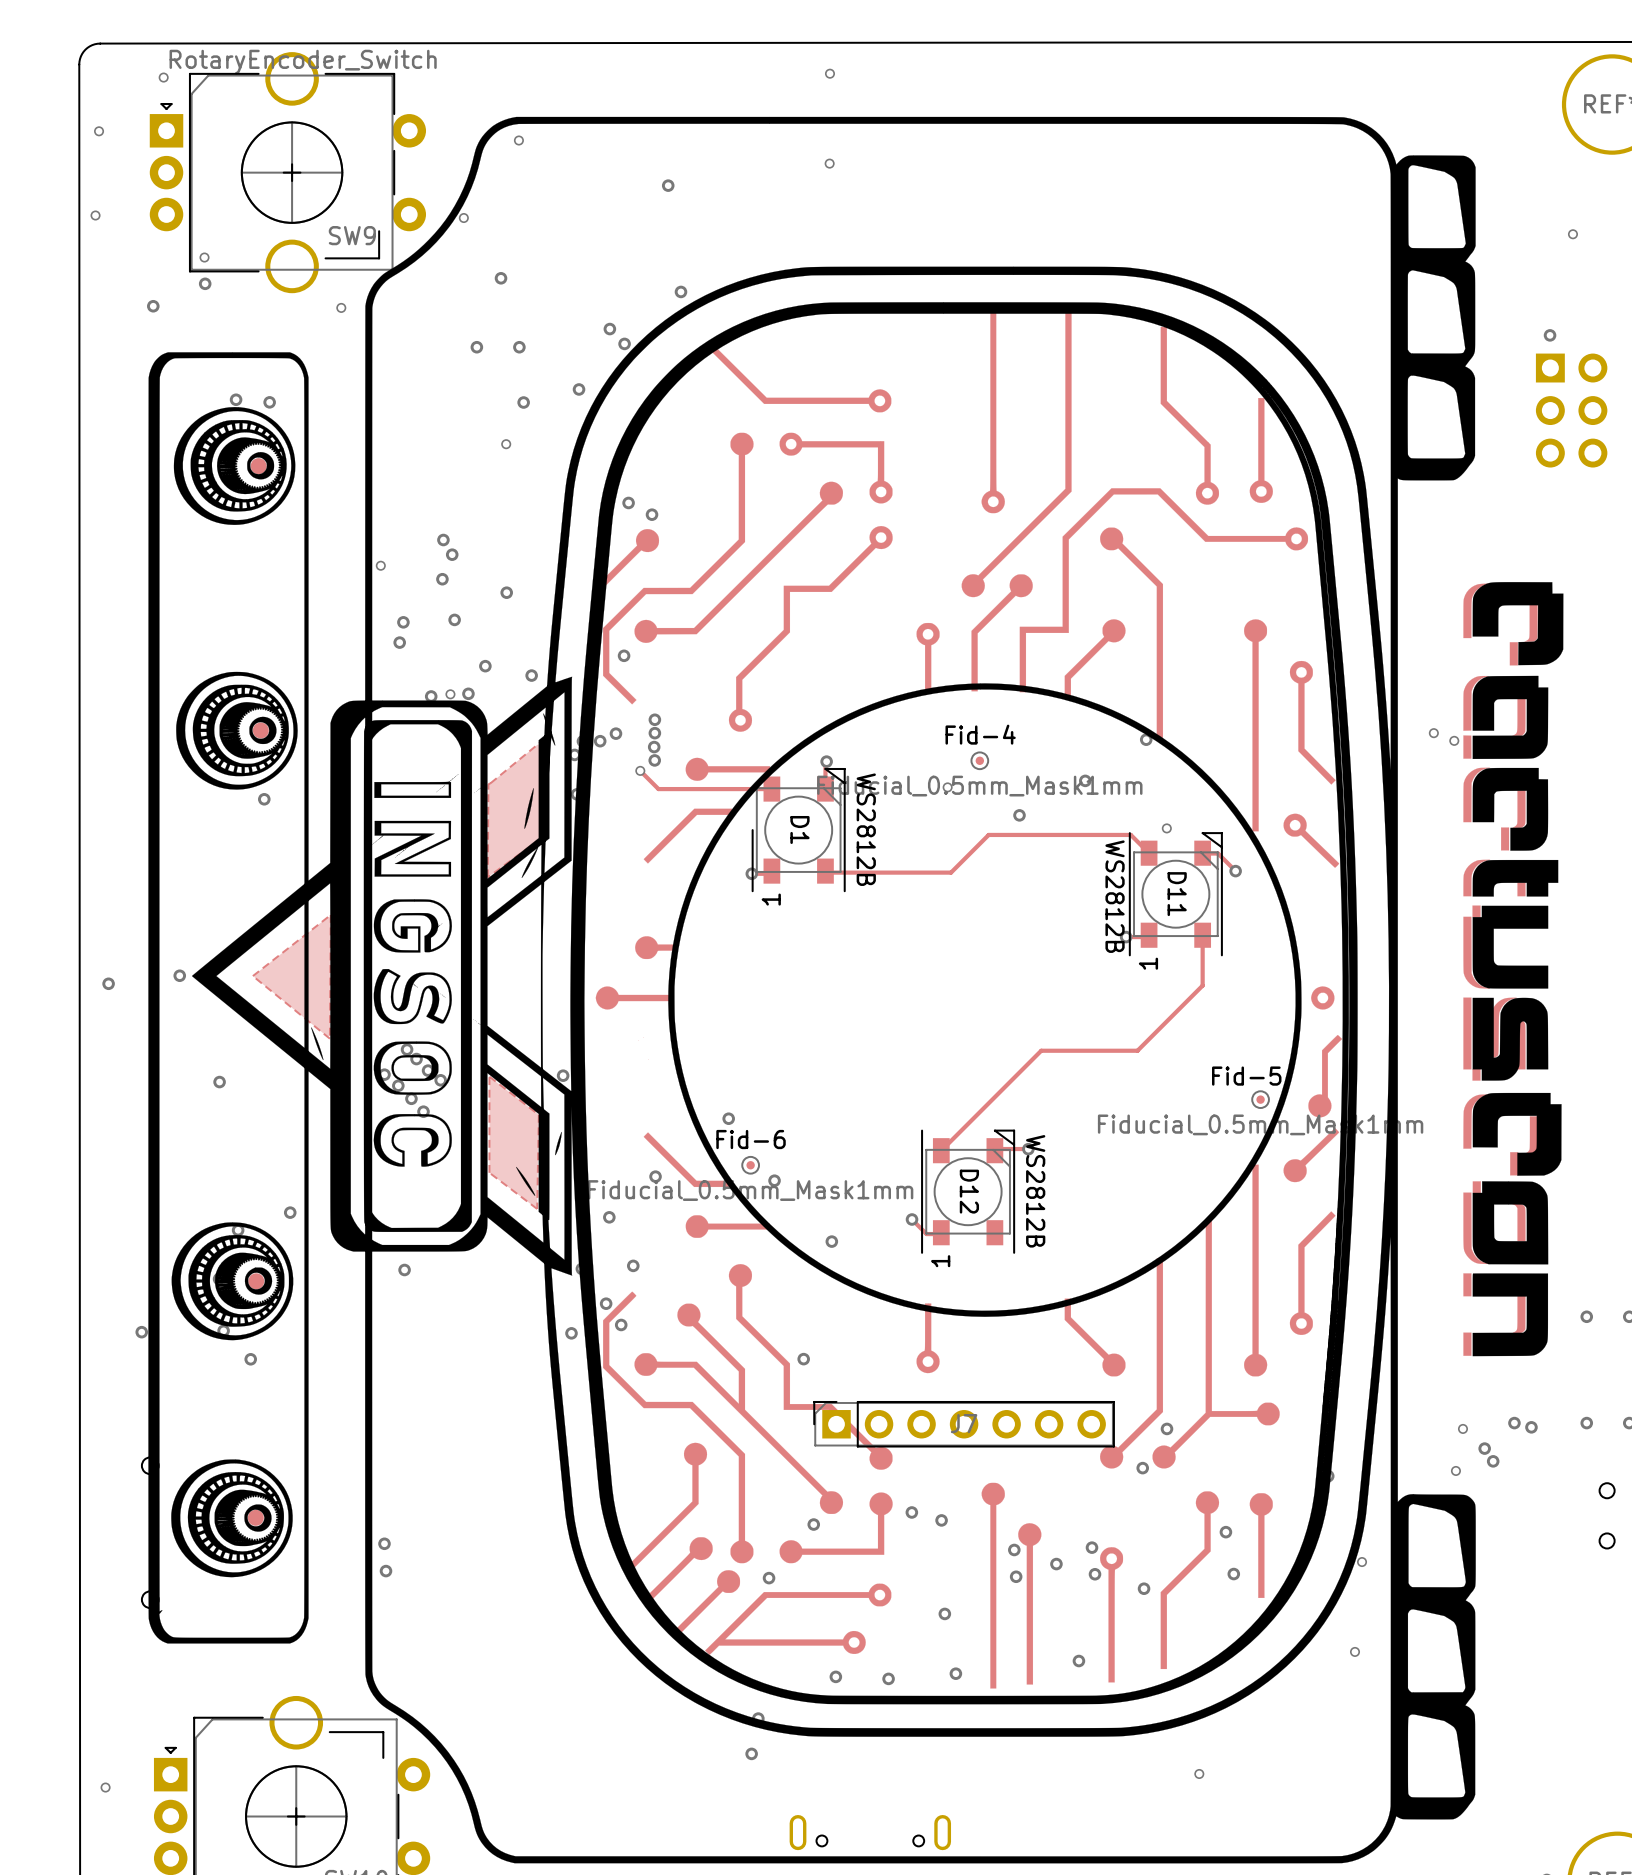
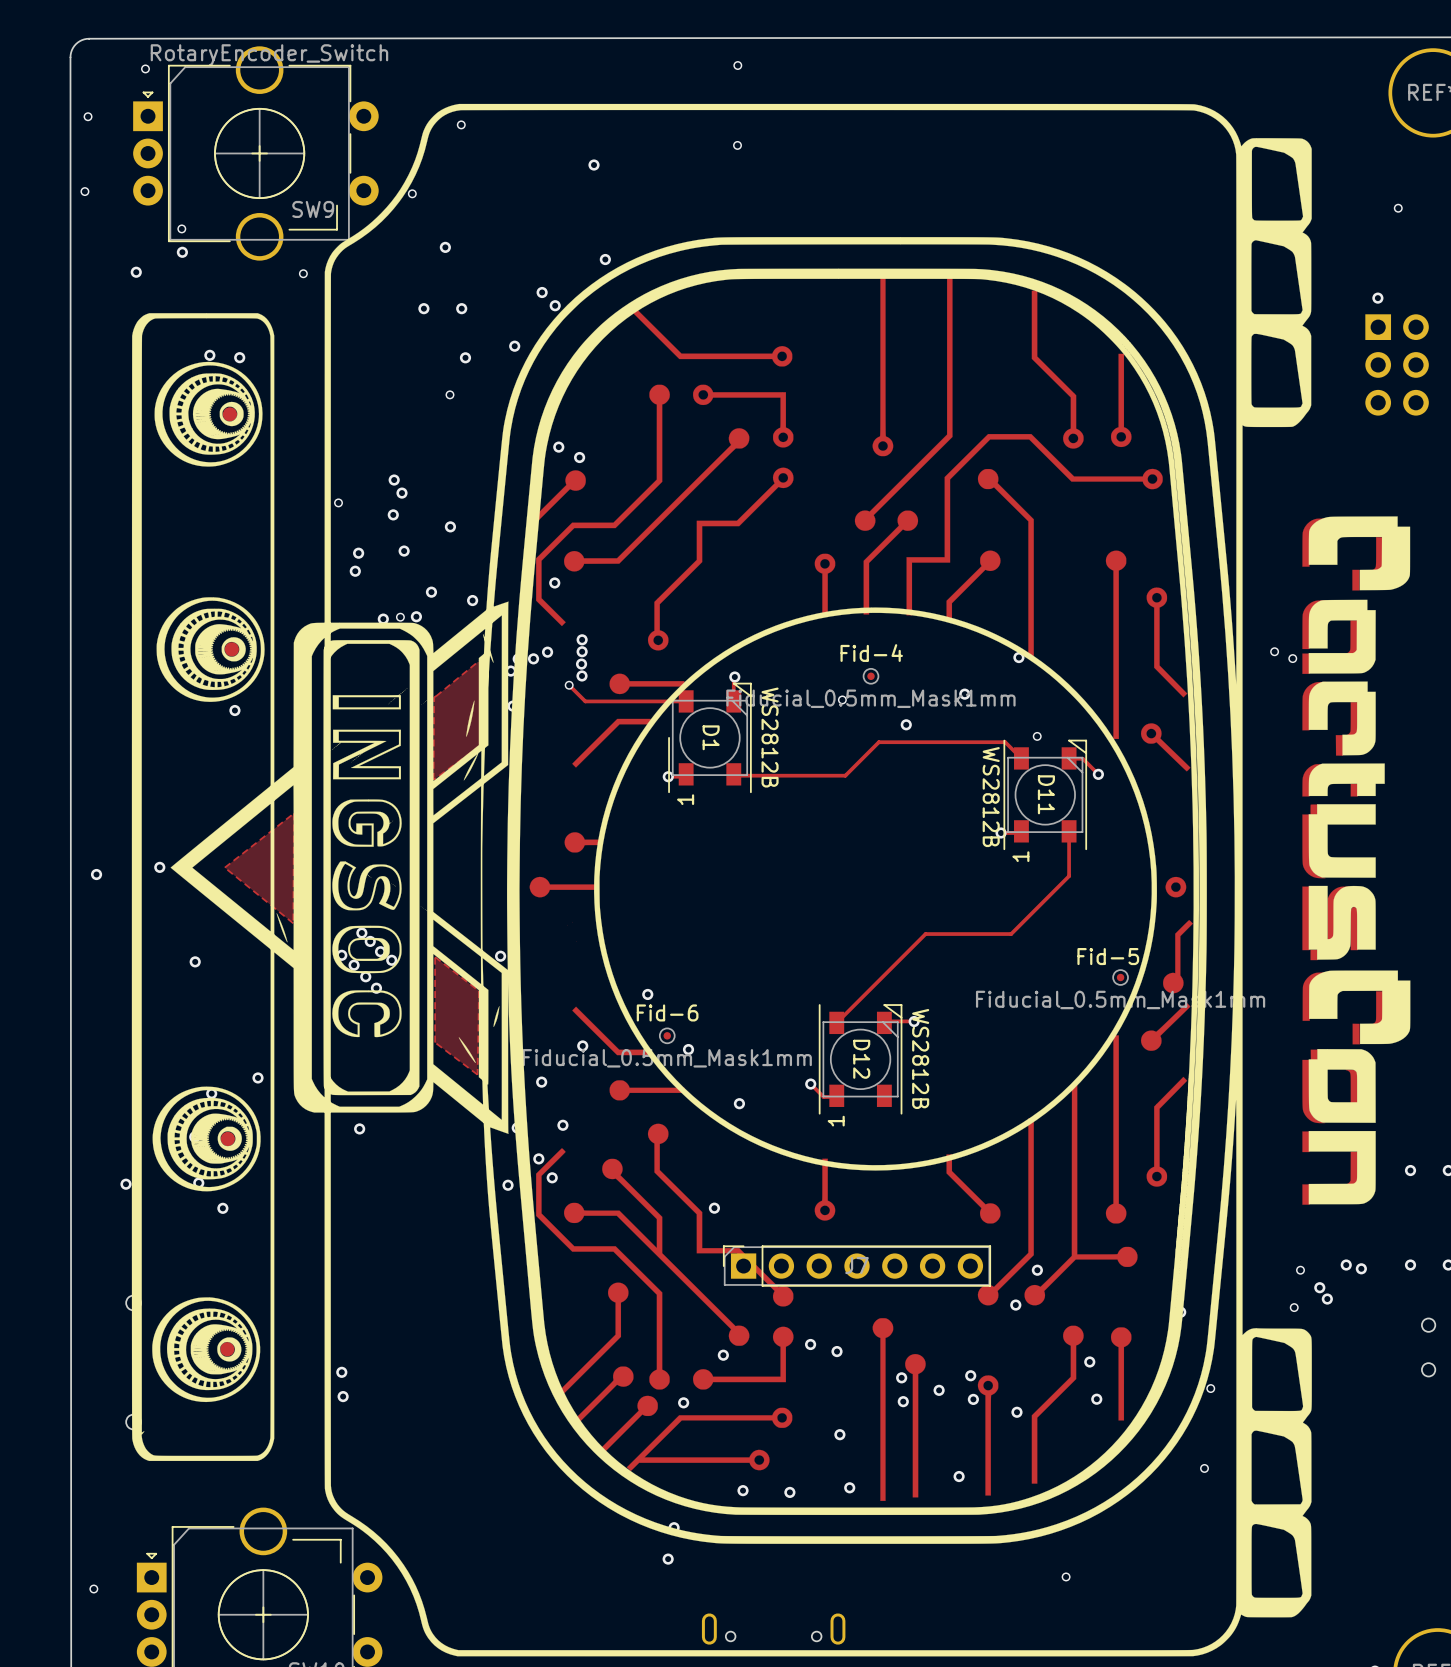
drawing: none -> [1302, 516, 1411, 1205]
drawing: [1463, 582, 1564, 1357] -> none

